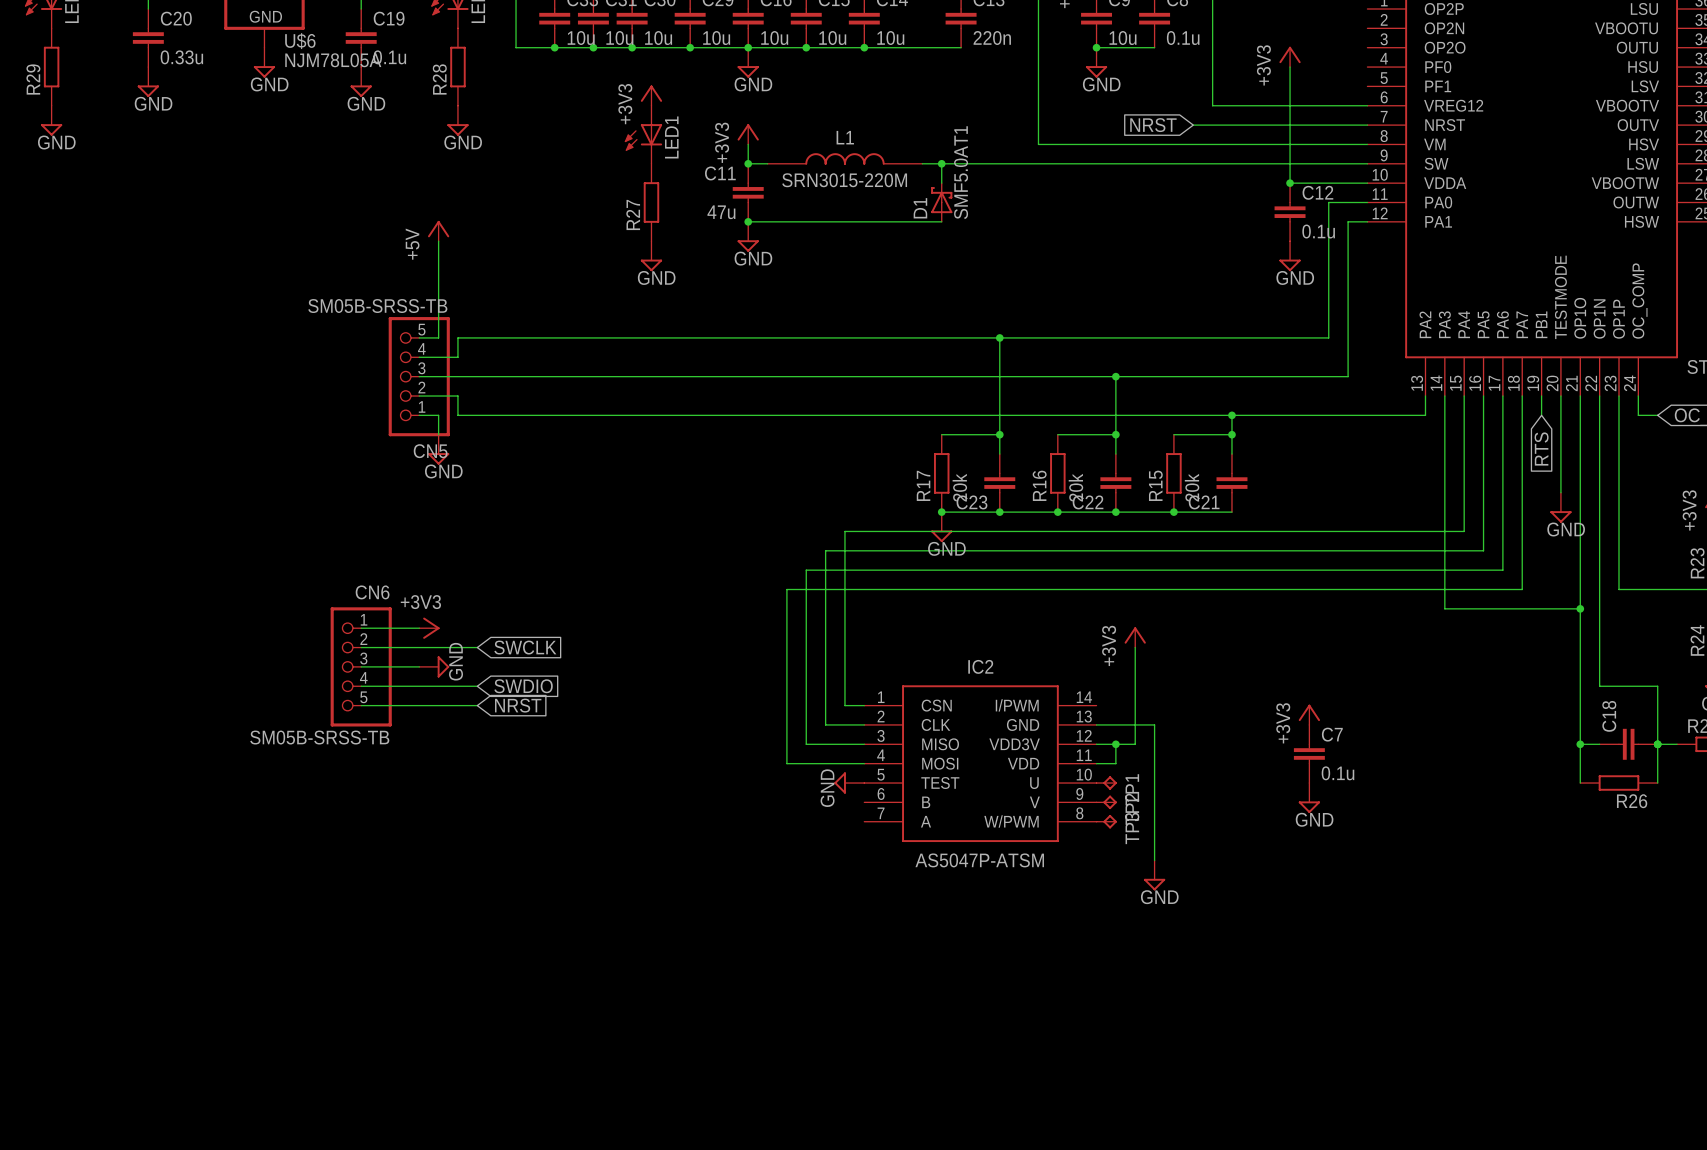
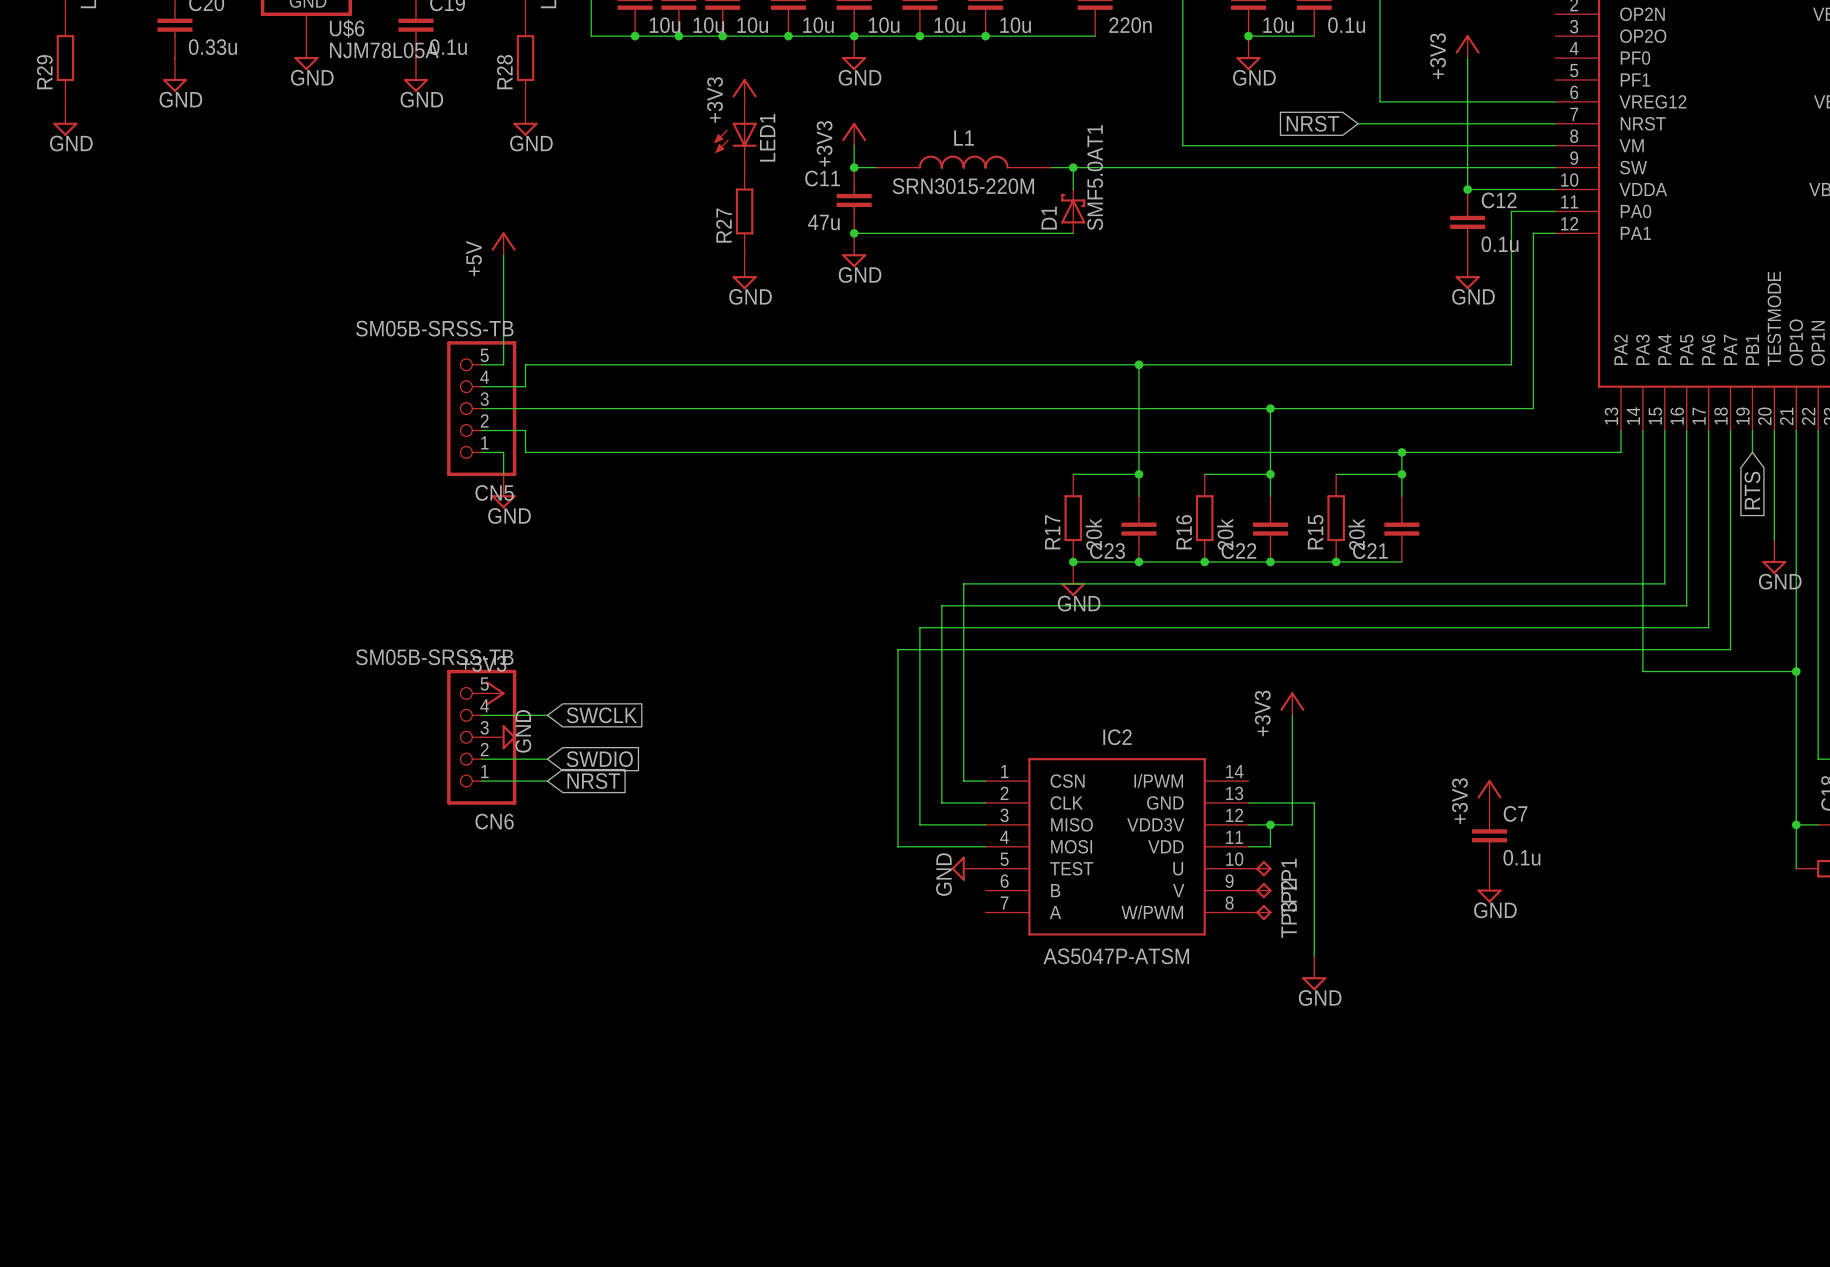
wire: (361, 628) (419, 628) -> none
wire: (361, 647) (419, 647) -> none
wire: (361, 666) (419, 666) -> none
CN6 flip: as is (361, 666) -> up-down (481, 737)
wire: (361, 686) (419, 686) -> none
wire: (361, 705) (419, 705) -> none

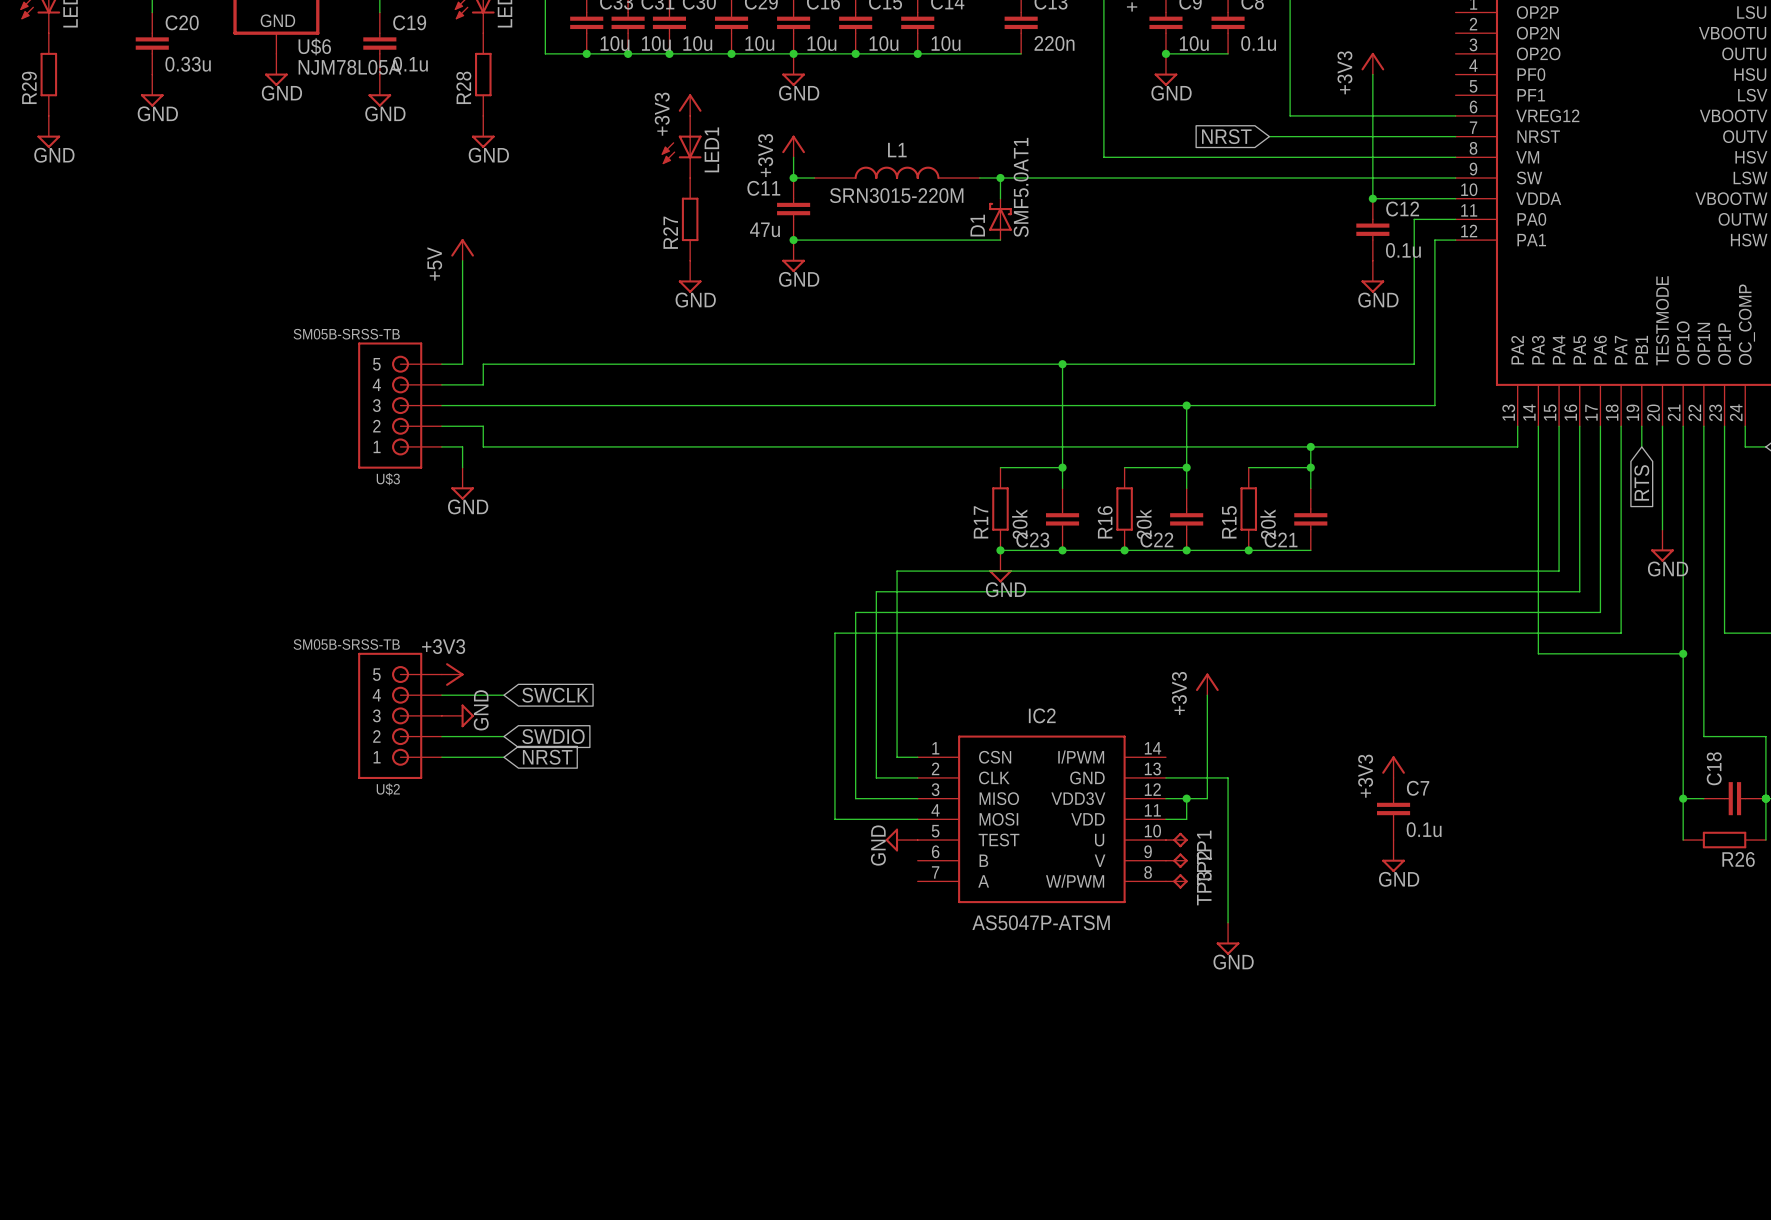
U$3: none -> SM05B-SRSS-TB (400, 405)
CN5: SM05B-SRSS-TB (481, 408) -> none
U$2: none -> SM05B-SRSS-TB (400, 715)
CN6: SM05B-SRSS-TB (481, 737) -> none

